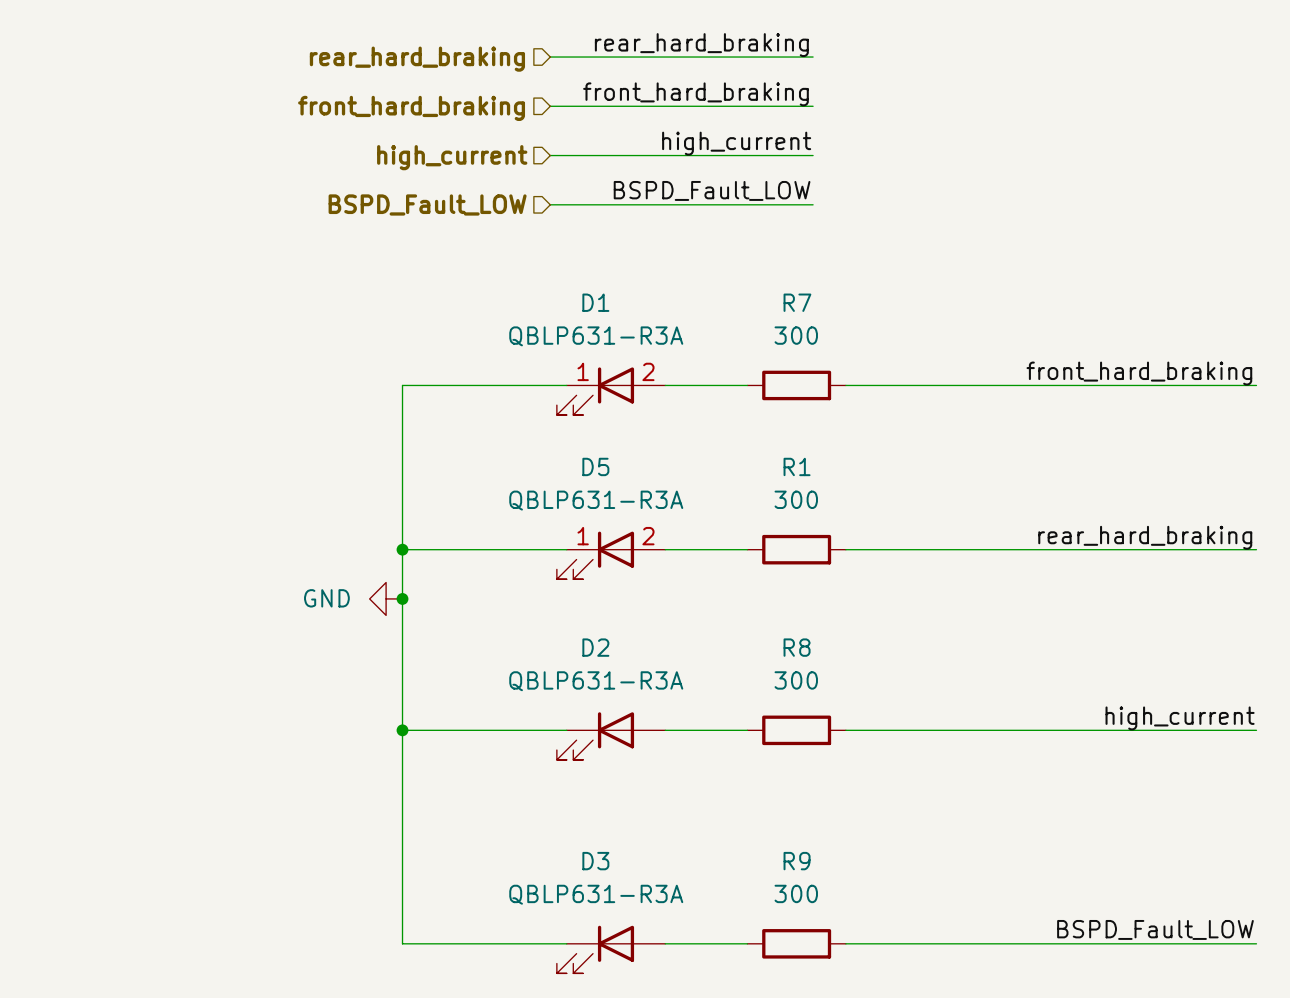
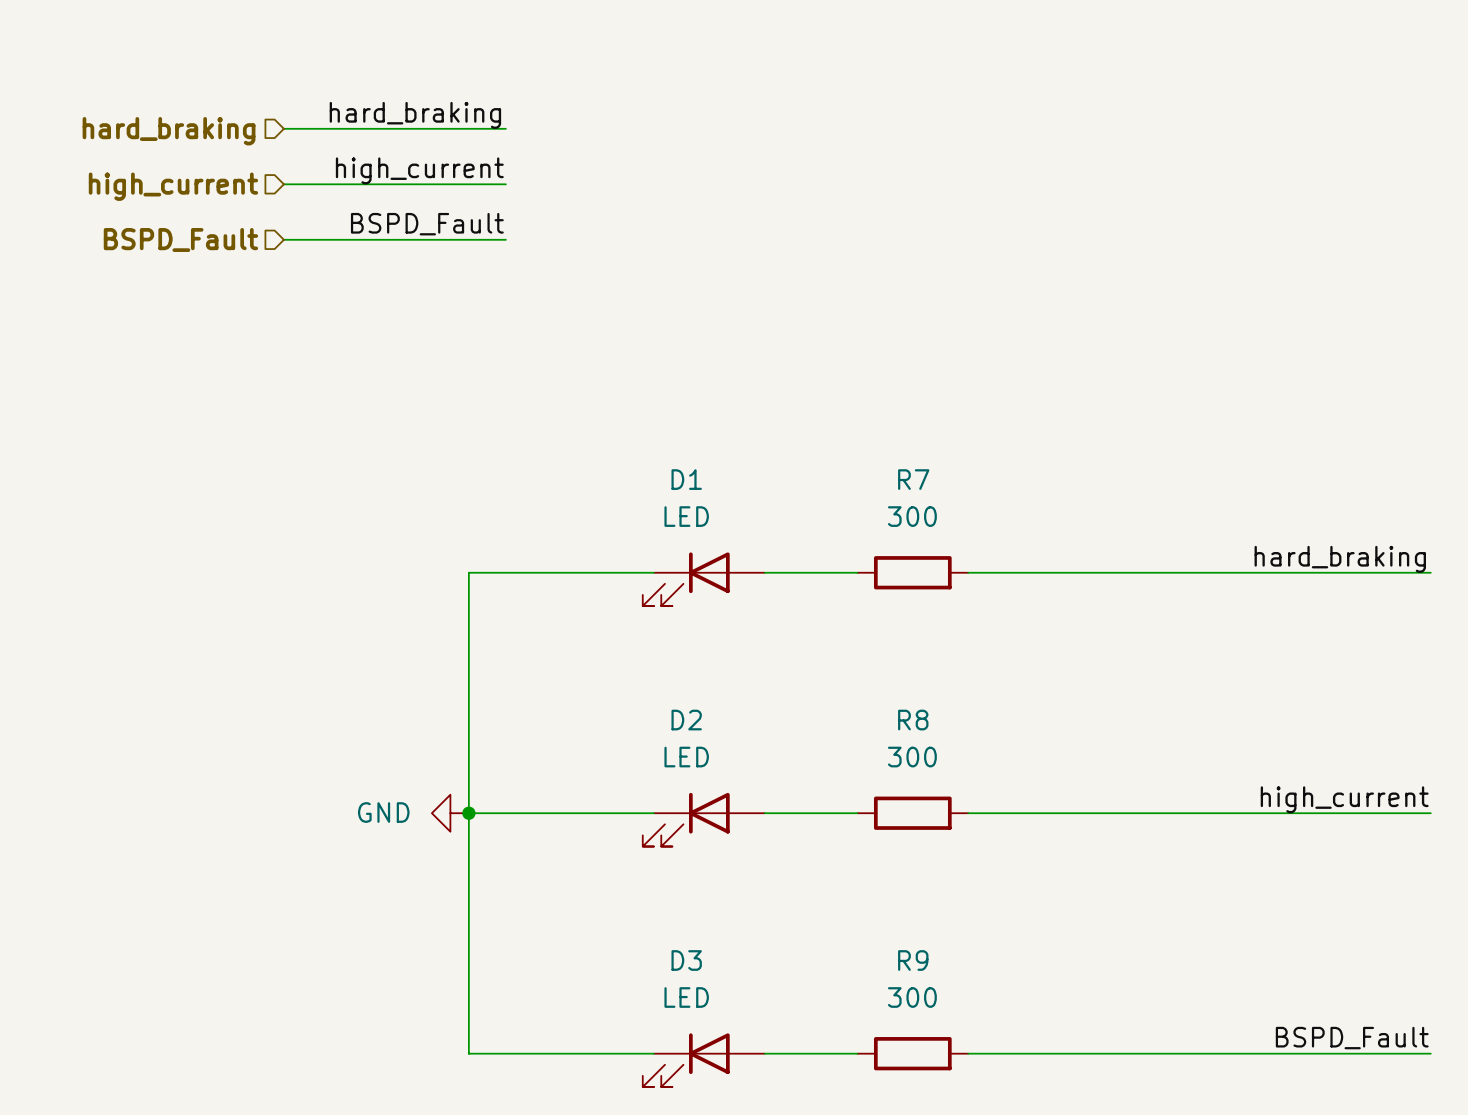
label: rear_hard_braking (701, 45) -> none
wire: (550, 57) (813, 57) -> none
hierarchical label: rear_hard_braking (417, 59) -> none
label: front_hard_braking (695, 94) -> none
wire: (550, 106) (813, 106) -> none
hierarchical label: front_hard_braking (411, 108) -> none
label: none -> hard_braking (415, 115)
wire: none -> (283, 128) (505, 128)
hierarchical label: none -> hard_braking (169, 131)
label: high_current (736, 143) -> none
wire: (550, 155) (813, 155) -> none
hierarchical label position: high_current (452, 157) -> high_current (173, 186)
label: none -> high_current (419, 170)
wire: none -> (283, 184) (505, 184)
label: BSPD_Fault_LOW (712, 190) -> none
hierarchical label: BSPD_Fault_LOW (427, 204) -> none
wire: (550, 204) (813, 204) -> none
label: none -> BSPD_Fault (427, 224)
hierarchical label: none -> BSPD_Fault (180, 239)
wire: none -> (283, 239) (505, 239)
D1 value: QBLP631-R3A (596, 336) -> LED (686, 516)
D1 pin number: 1 (583, 371) -> none
D1 pin number: 2 (648, 371) -> none
label: front_hard_braking (1139, 373) -> none
wire: (566, 385) (402, 385) (402, 516) -> (653, 572) (468, 572)
wire: (665, 385) (747, 385) -> none
R7 position: (796, 385) -> (912, 572)
wire: (845, 385) (1256, 385) -> none
D1 position: (611, 391) -> (703, 579)
label: rear_hard_braking (1145, 537) -> hard_braking (1340, 559)
wire: (402, 549) (566, 549) -> none
junction: (402, 549) -> none
wire: (665, 549) (747, 549) -> (764, 572) (857, 572)
R1: 300 (796, 549) -> none
wire: (845, 549) (1256, 549) -> (968, 572) (1430, 572)
D5: QBLP631-R3A (611, 555) -> none
power symbol position: GND (386, 598) -> GND (450, 813)
junction: (402, 598) -> none
D2 value: QBLP631-R3A (596, 681) -> LED (686, 757)
D3 value: QBLP631-R3A (596, 894) -> LED (686, 997)
label: BSPD_Fault_LOW (1155, 929) -> BSPD_Fault (1352, 1038)

